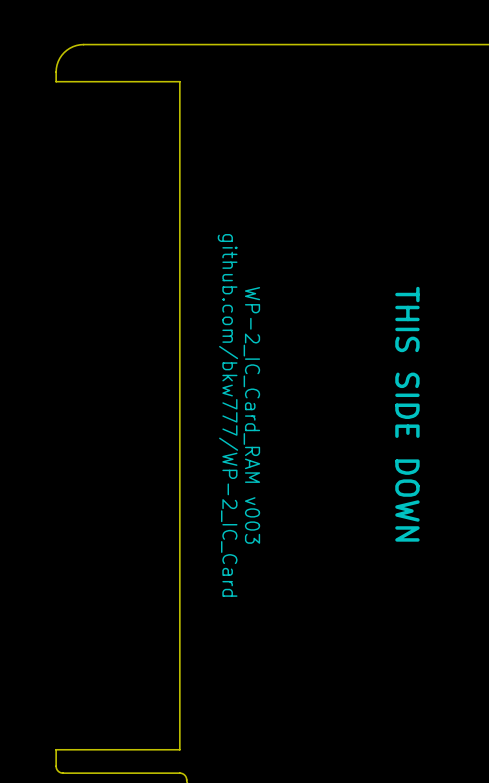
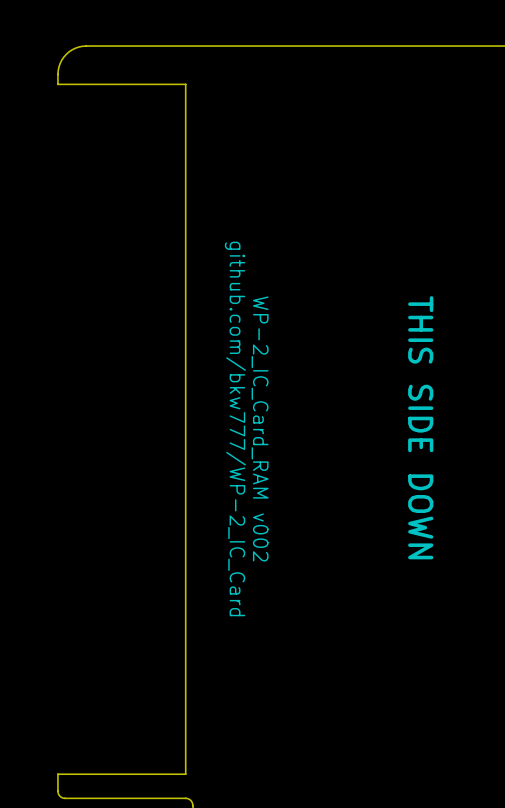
text: WP-2_IC_Card_RAM v003 (251, 415) -> WP-2_IC_Card_RAM v002 (260, 428)

